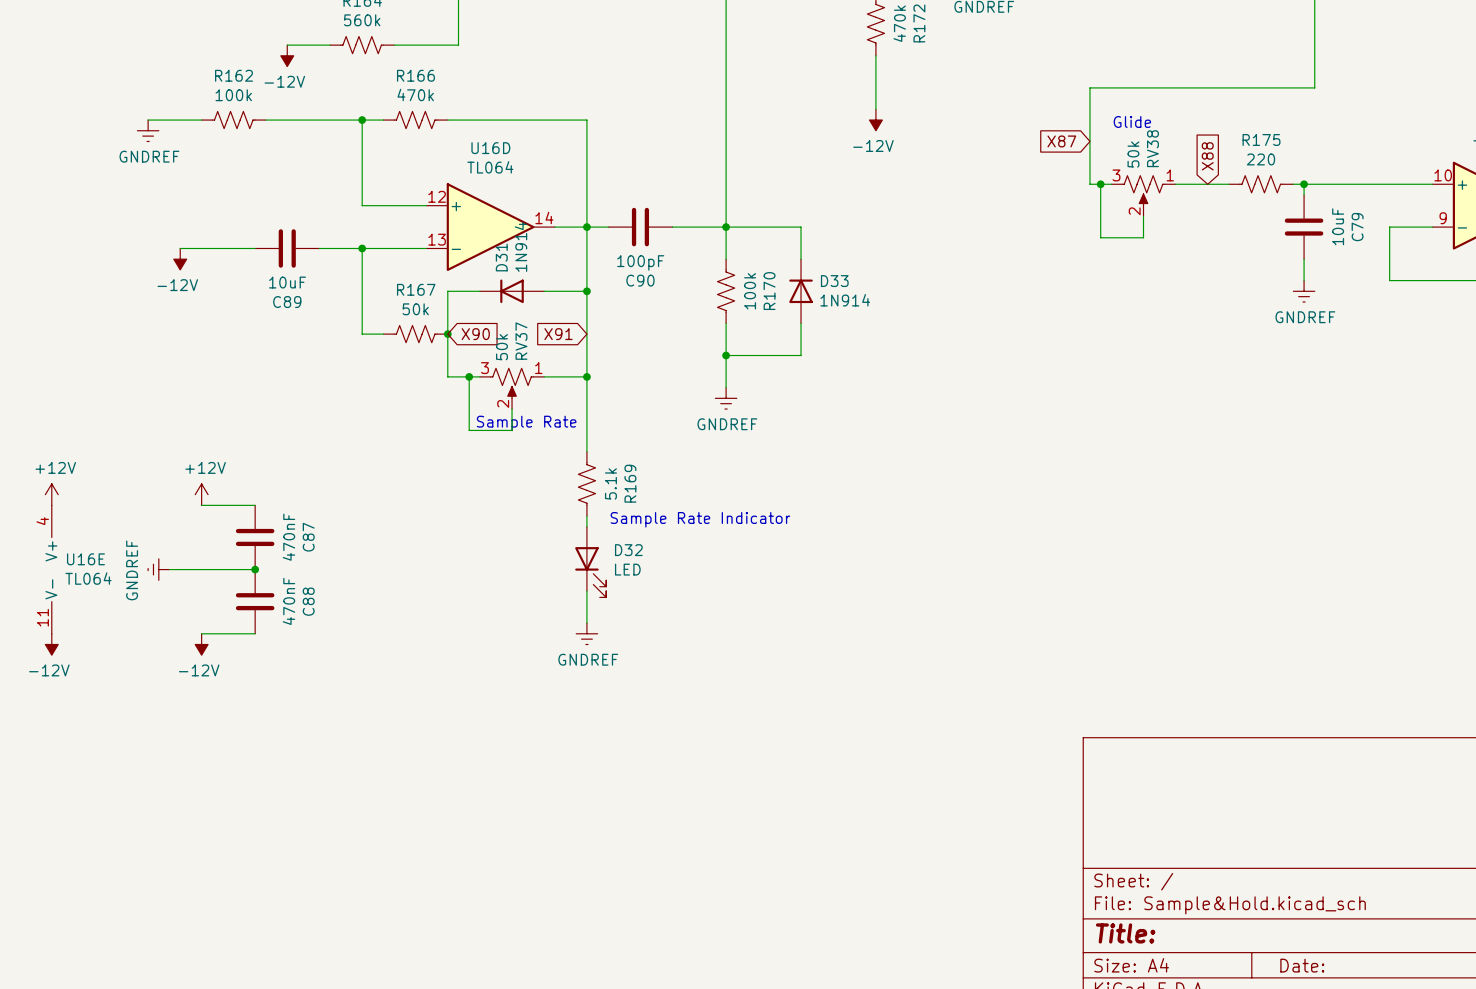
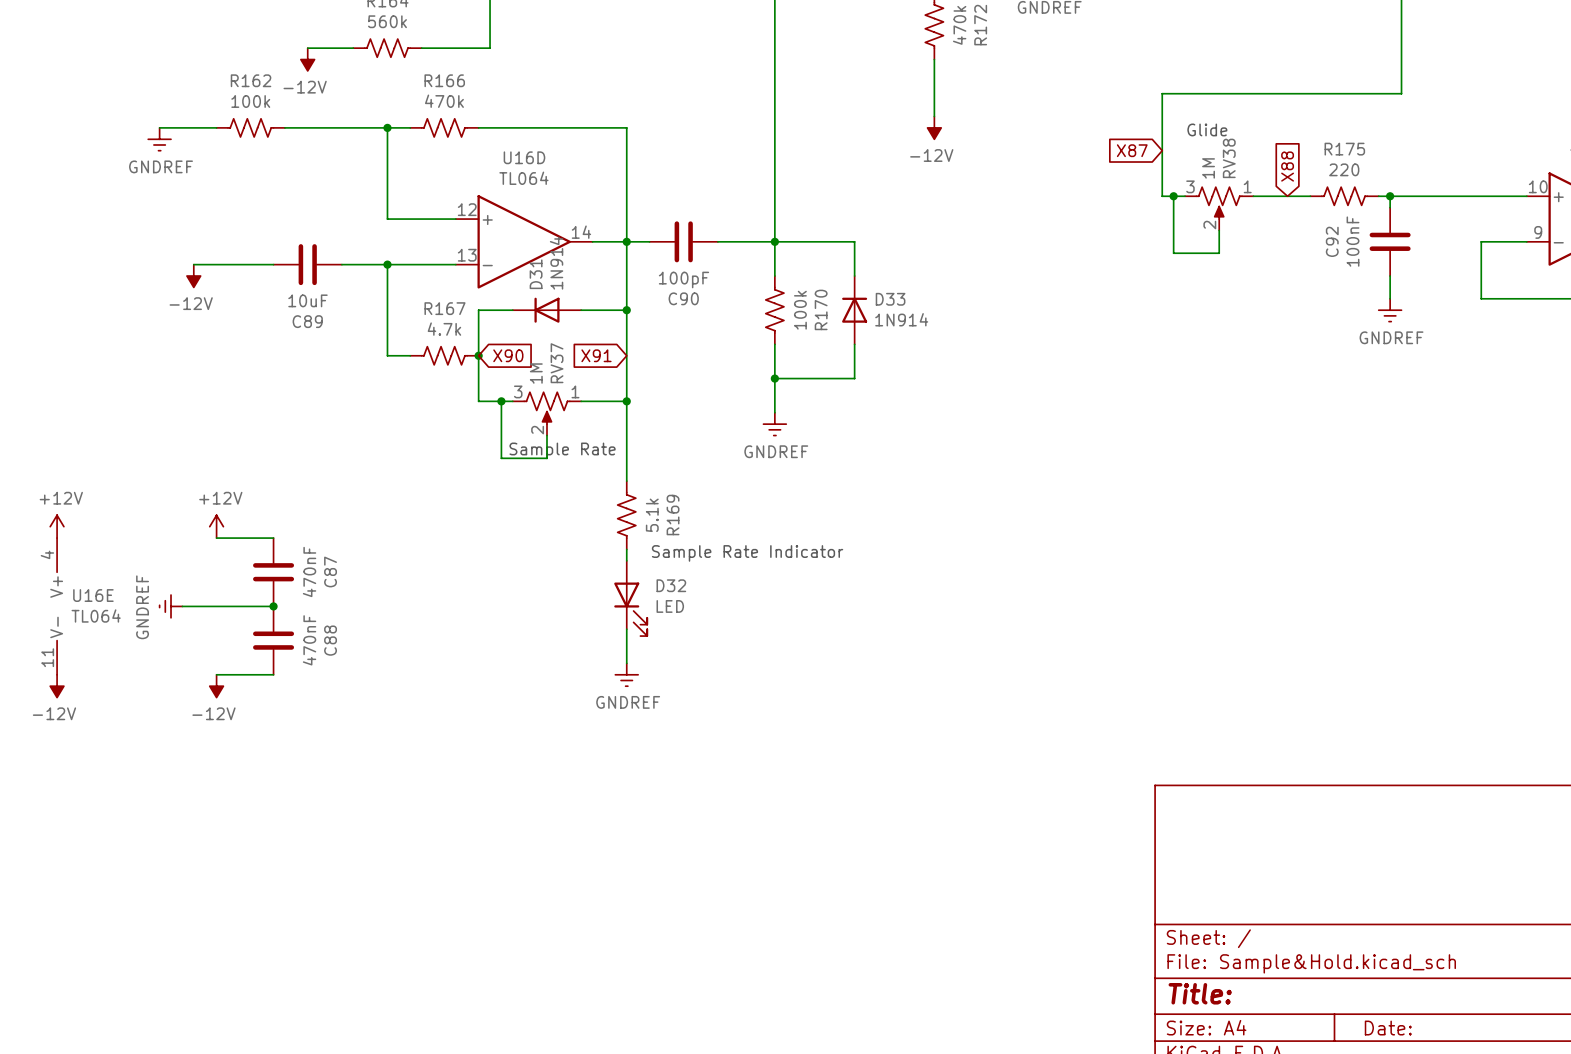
RV38 value: 50k (1133, 154) -> 1M (1208, 168)
C79 value: 10uF (1338, 226) -> 100nF (1353, 241)
C79 name: C79 (1357, 227) -> C92 (1332, 241)
R167 value: 50k (415, 309) -> 4.7k (444, 329)
RV37 value: 50k (501, 347) -> 1M (536, 373)

